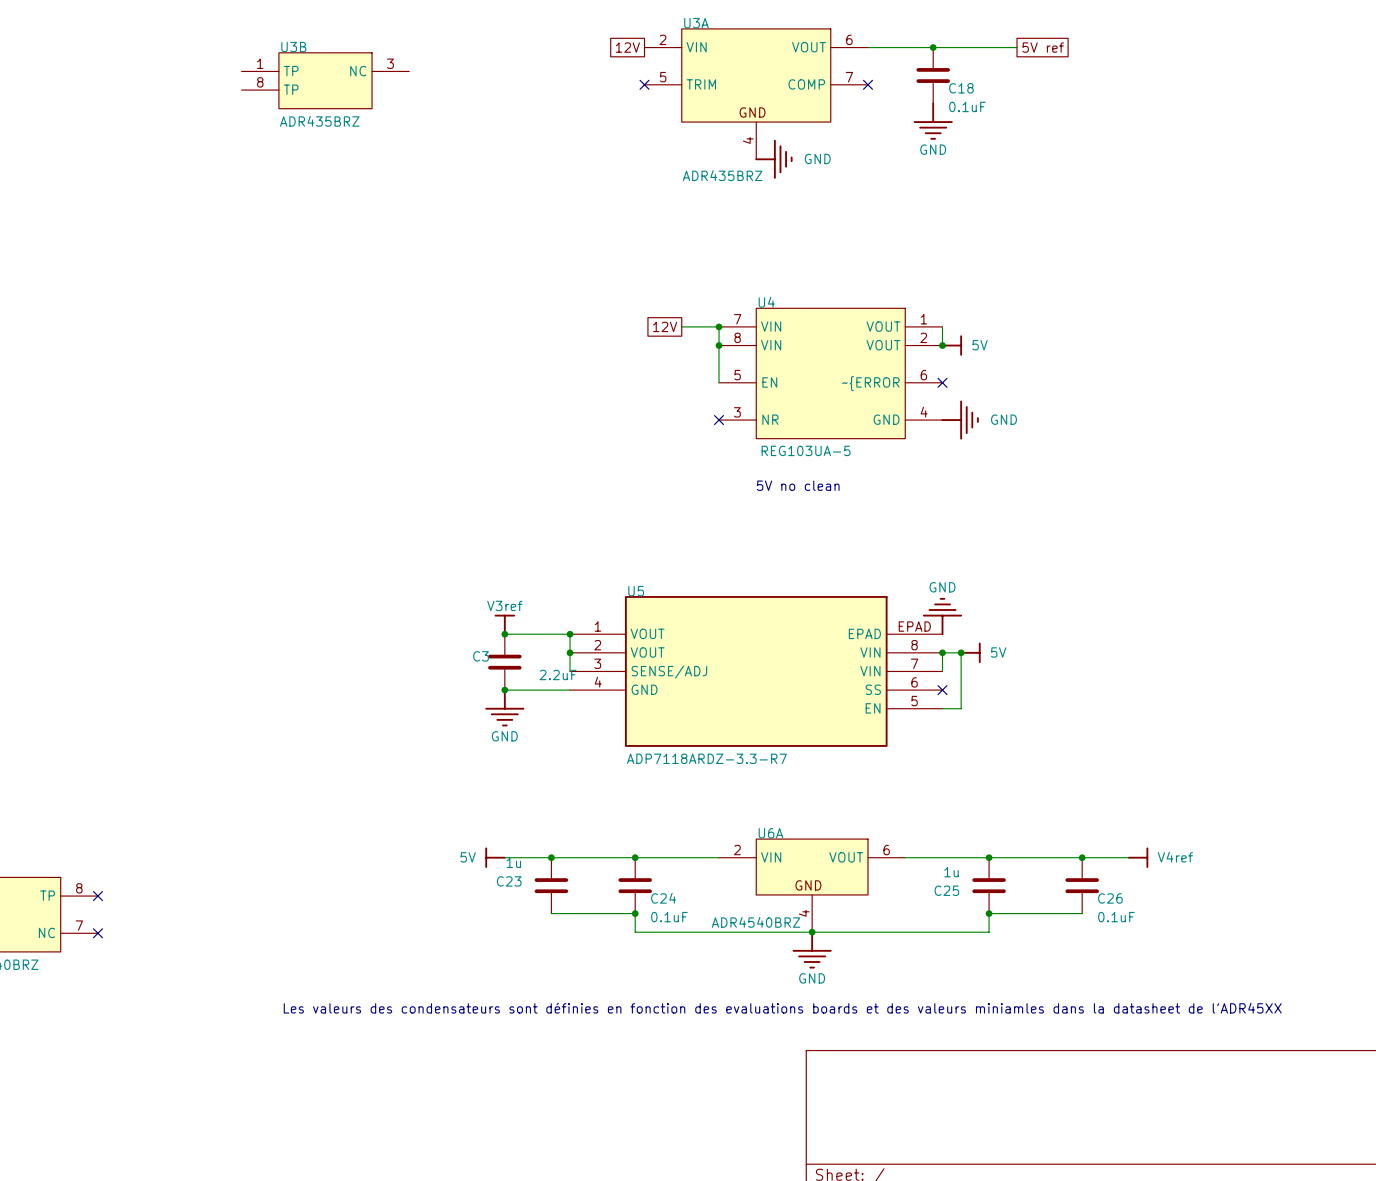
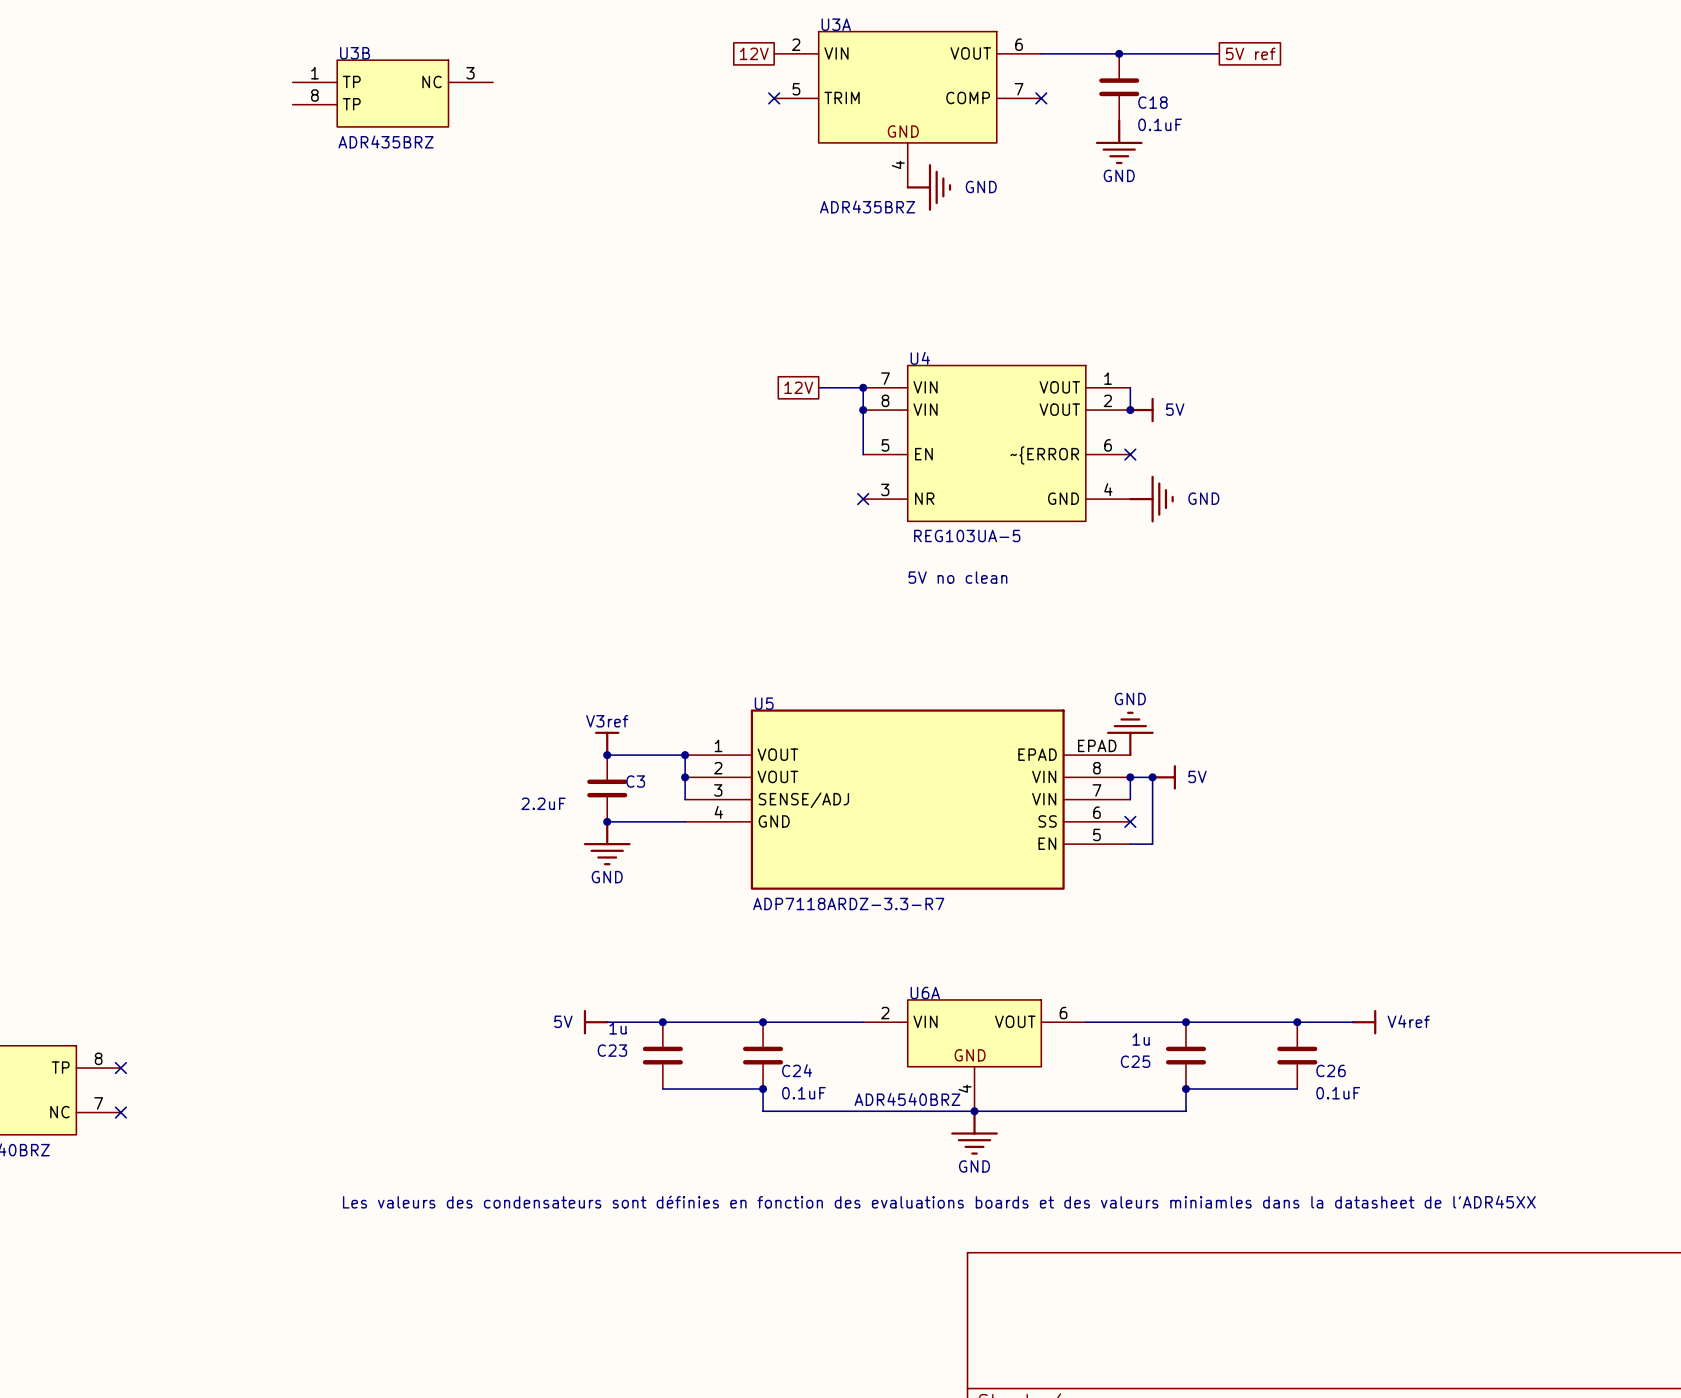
C3 name position: C3 (481, 656) -> C3 (635, 781)
C3 value position: 2.2uF (558, 674) -> 2.2uF (543, 803)

